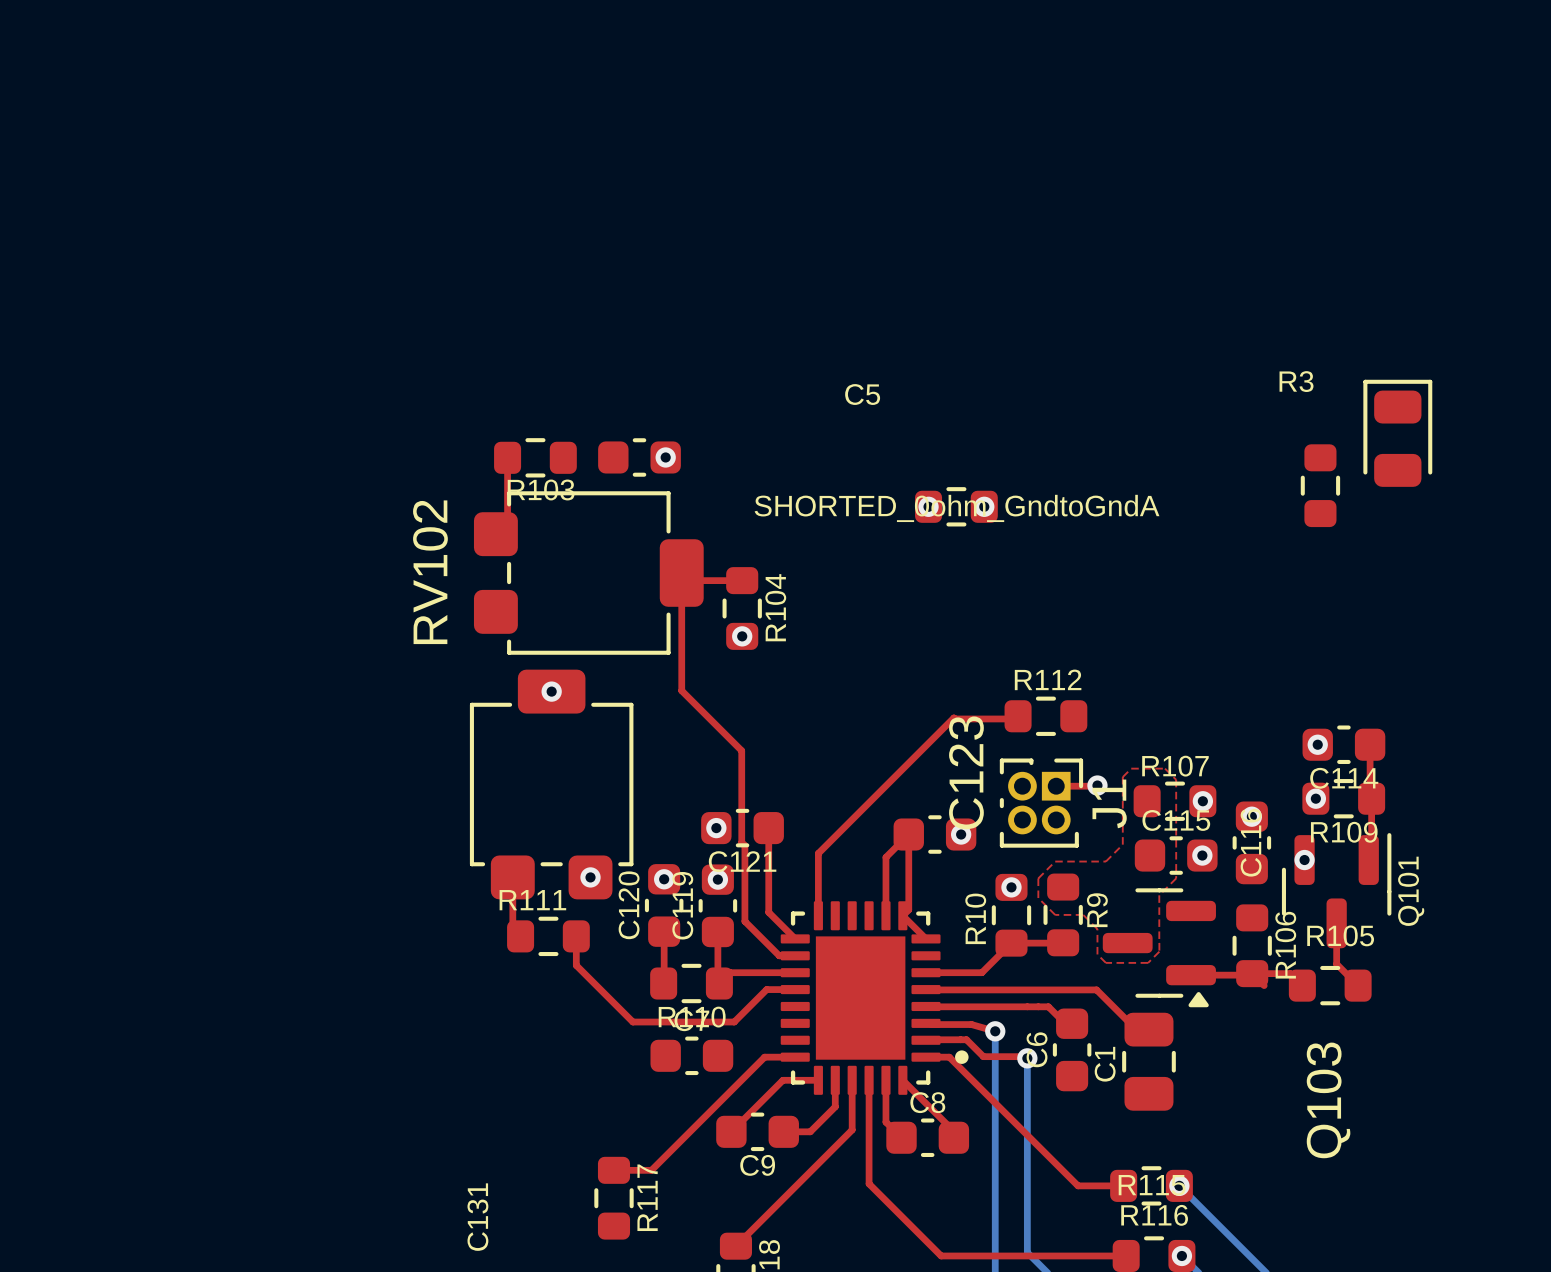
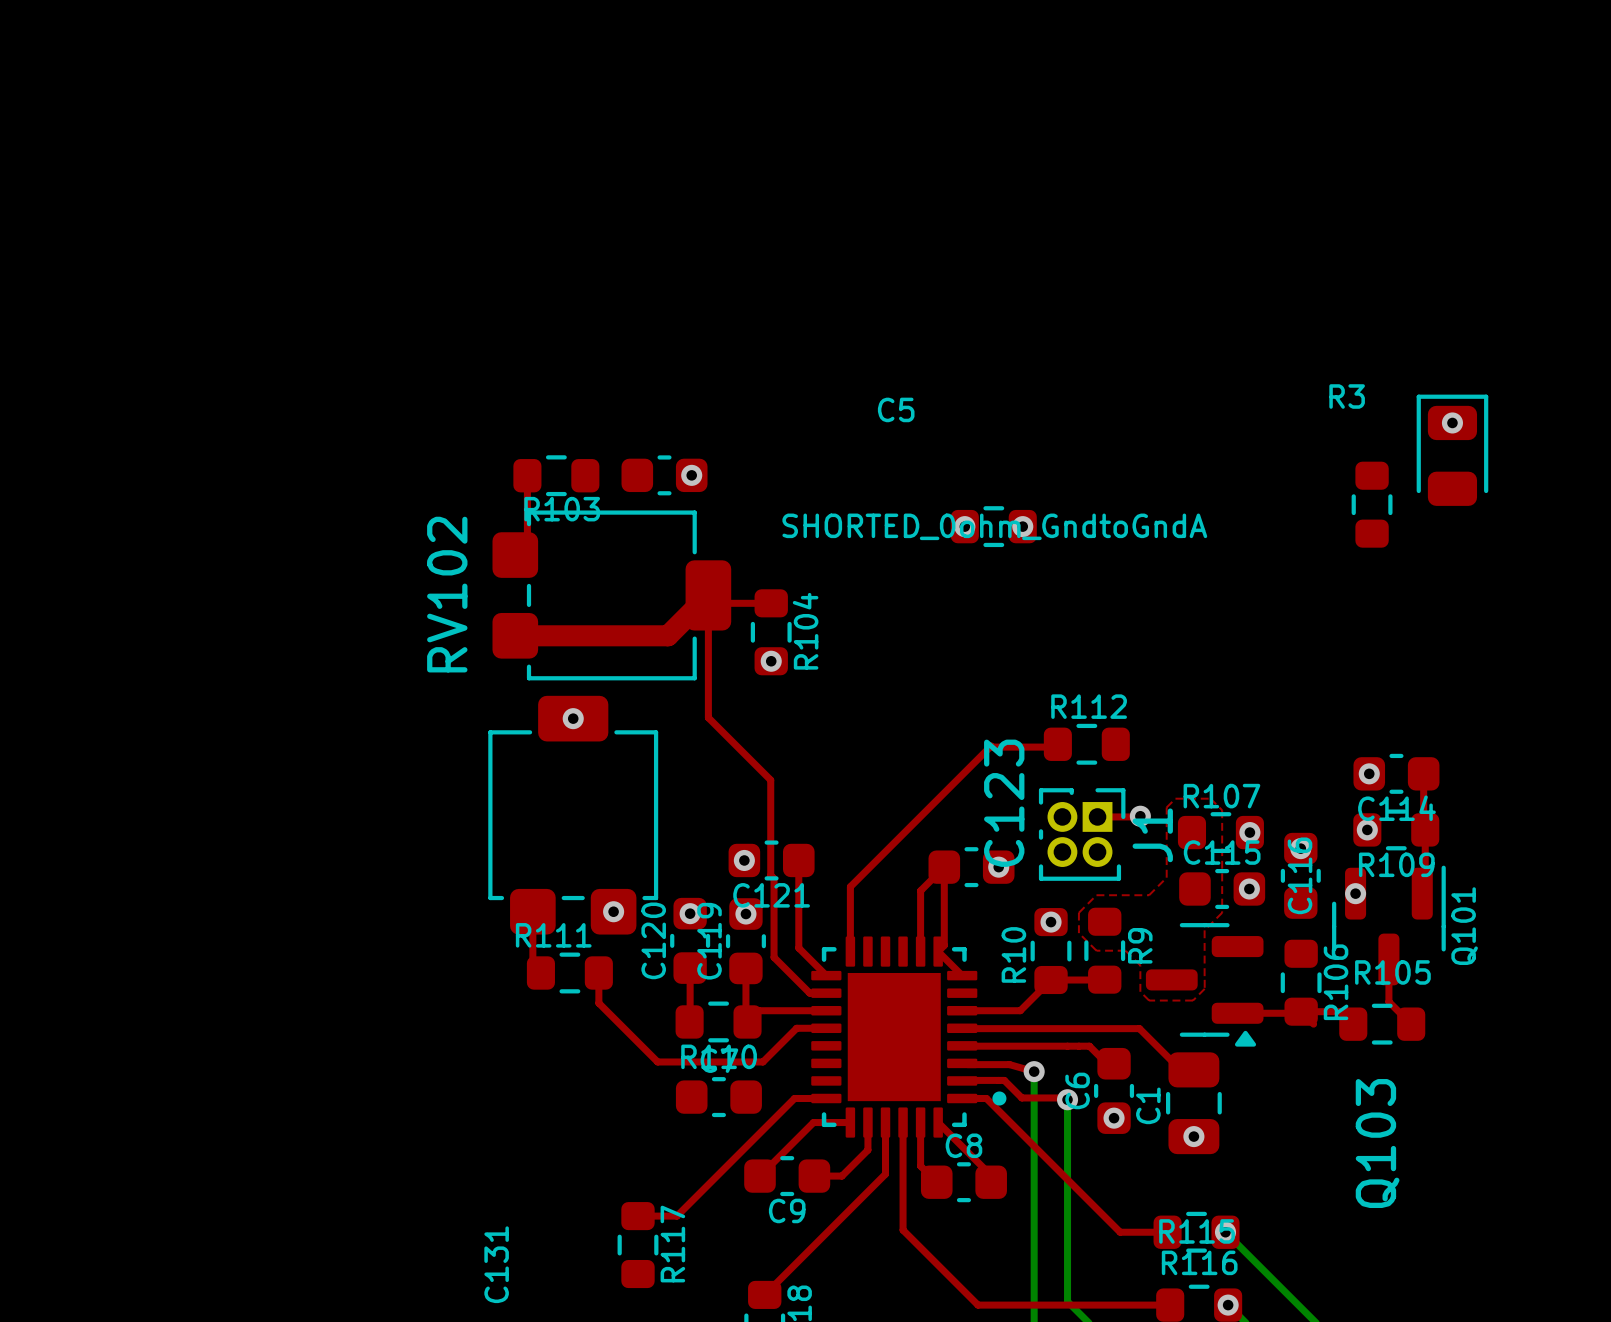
via: none -> (1452, 422)
top track: none -> (708, 595) (668, 635) (515, 635)
via: none -> (1114, 1118)
via: none -> (1193, 1136)

